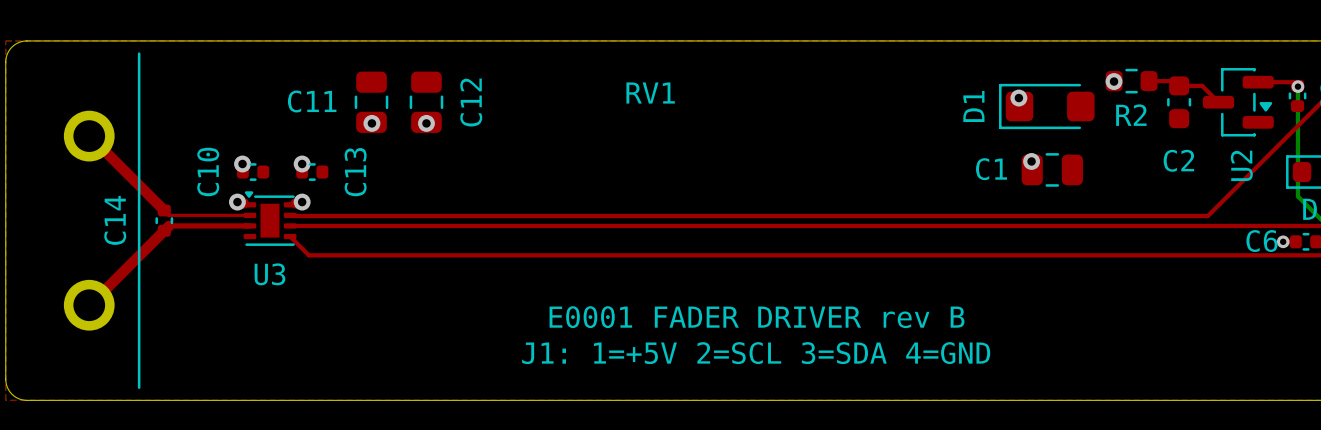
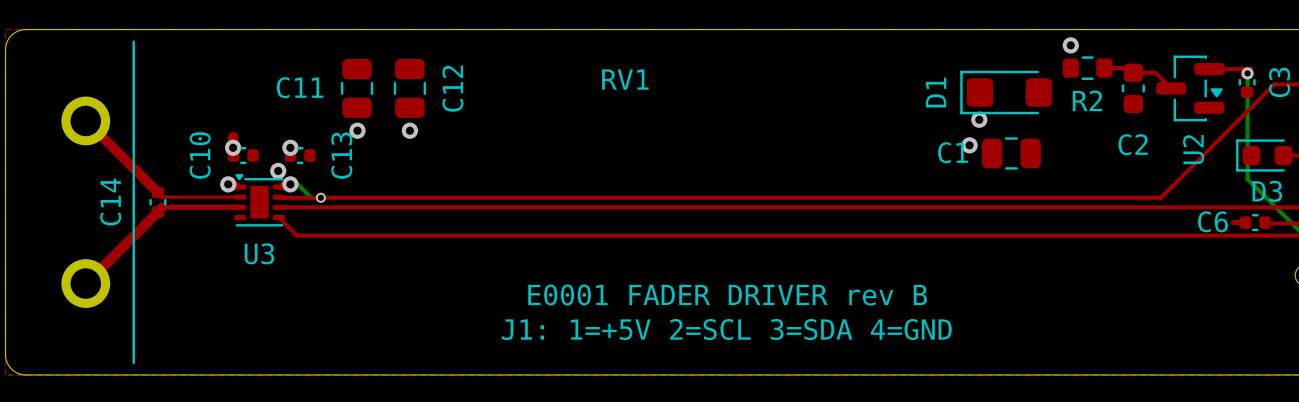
via position: (1114, 81) -> (1070, 45)
via: (1018, 98) -> none
via position: (371, 123) -> (357, 130)
via position: (426, 123) -> (409, 130)
via: none -> (979, 119)
top track: none -> (233, 136) (233, 147)
via: none -> (969, 145)
via: (1031, 161) -> none
via: none -> (278, 170)
bottom track: none -> (294, 180) (311, 197) (320, 197)
via: none -> (320, 197)
via: (1283, 241) -> none

